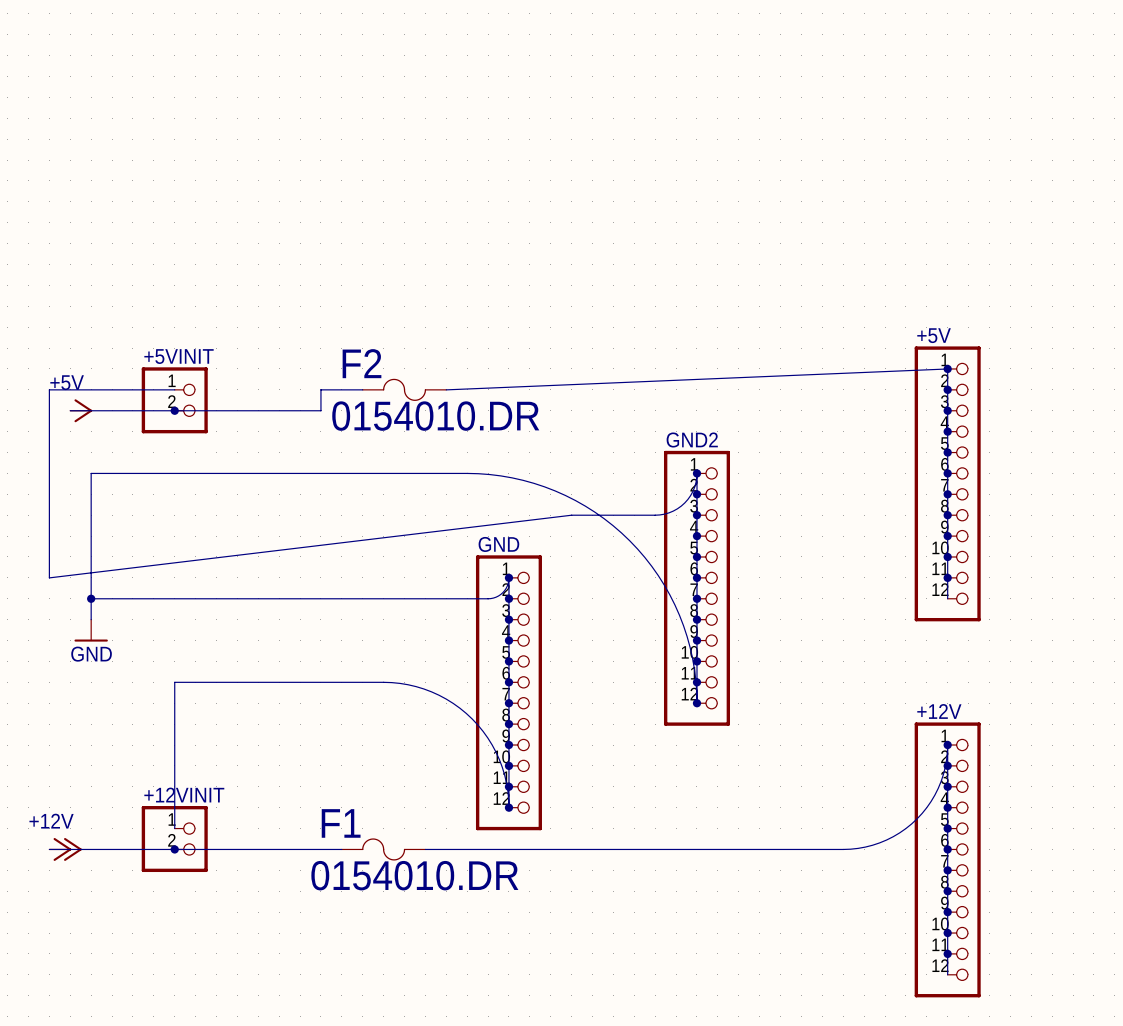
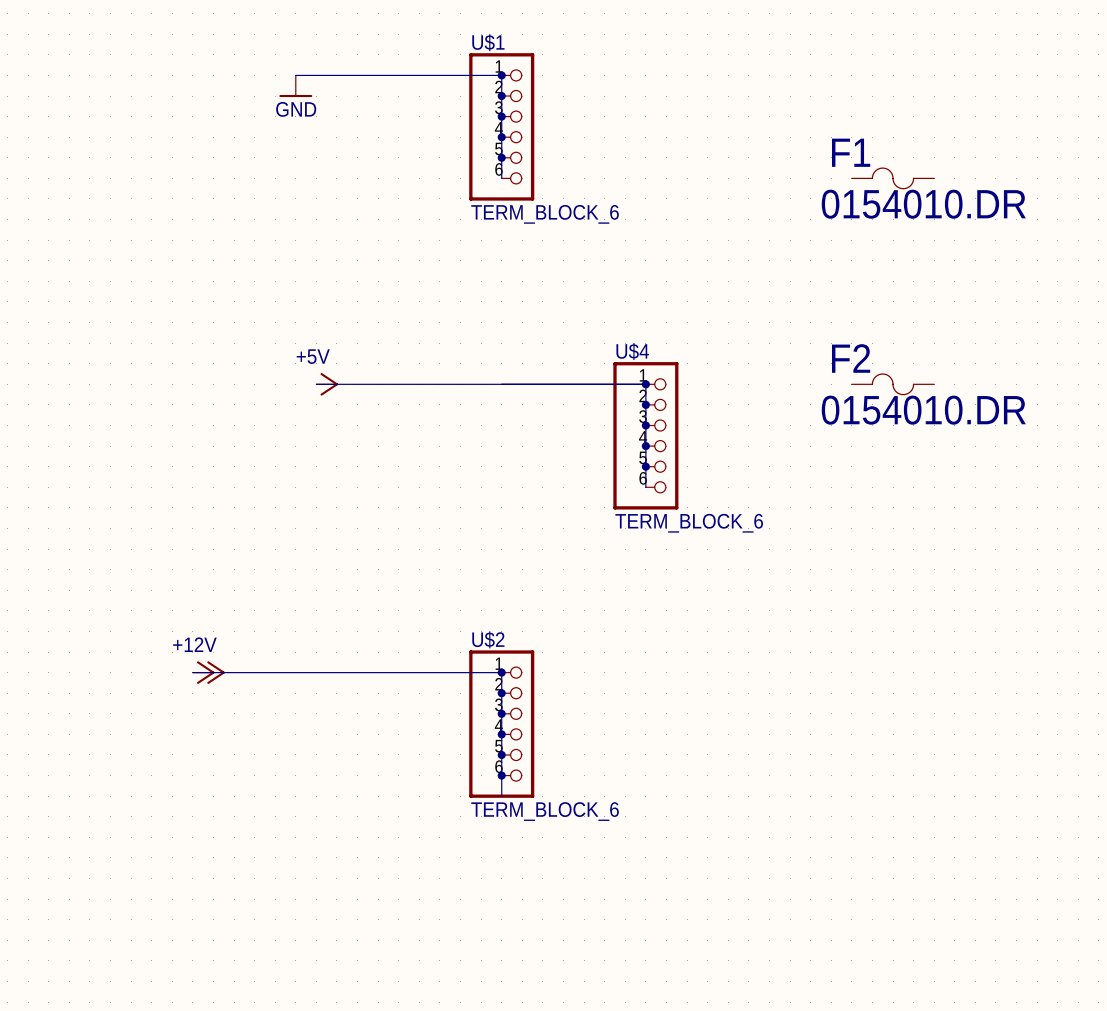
wire: none -> (295, 75) (501, 75) (501, 178)
junction: none -> (501, 75)
power symbol: none -> GND (295, 86)
junction: none -> (501, 96)
junction: none -> (501, 116)
U$1: none -> TERM_BLOCK_6 (501, 126)
junction: none -> (501, 137)
junction: none -> (501, 157)
junction: (947, 368) -> none
wire: (174, 389) (49, 389) (49, 577) (571, 515) (655, 515) (659, 514) (673, 511) (687, 499) (694, 487) (696, 473) (696, 703) (692, 658) (683, 625) (669, 594) (644, 557) (612, 525) (604, 518) (594, 512) (575, 500) (544, 486) (500, 475) (467, 473) (91, 473) (91, 619) -> none
wire: (320, 389) (320, 410) (70, 410) -> none
power symbol: none -> +5V (327, 384)
wire: none -> (357, 384) (645, 384) (645, 487)
F2 position: (404, 389) -> (893, 384)
wire: (446, 389) (947, 368) (947, 598) -> none
junction: none -> (645, 384)
junction: (947, 389) -> none
+5VINIT: (174, 400) -> none
power symbol: +5V (81, 410) -> none
junction: (174, 410) -> none
junction: none -> (645, 404)
junction: (947, 410) -> none
junction: none -> (645, 425)
junction: (947, 431) -> none
U$4: none -> TERM_BLOCK_6 (645, 435)
junction: none -> (645, 446)
junction: (947, 452) -> none
junction: none -> (645, 466)
junction: (696, 473) -> none
junction: (947, 473) -> none
+5V: (947, 483) -> none
junction: (696, 494) -> none
junction: (947, 494) -> none
junction: (696, 515) -> none
junction: (947, 515) -> none
junction: (696, 536) -> none
junction: (947, 536) -> none
junction: (696, 556) -> none
junction: (947, 556) -> none
junction: (508, 577) -> none
junction: (696, 577) -> none
junction: (947, 577) -> none
GND2: (696, 588) -> none
wire: (91, 598) (488, 598) (496, 597) (502, 592) (507, 585) (508, 577) (508, 682) -> none
junction: (91, 598) -> none
junction: (508, 598) -> none
junction: (696, 598) -> none
junction: (508, 619) -> none
junction: (696, 619) -> none
power symbol: GND (91, 630) -> none
junction: (508, 640) -> none
junction: (696, 640) -> none
junction: (508, 661) -> none
junction: (696, 661) -> none
wire: (195, 682) (174, 682) (174, 828) -> none
power symbol: none -> +12V (208, 672)
wire: (383, 682) (408, 684) (431, 691) (453, 703) (472, 719) (487, 738) (499, 759) (506, 783) (508, 807) -> (378, 672) (501, 672)
junction: (696, 682) -> none
GND: (508, 692) -> none
junction: (696, 703) -> none
U$2: none -> TERM_BLOCK_6 (501, 724)
junction: (947, 745) -> none
junction: (947, 765) -> none
junction: (947, 786) -> none
junction: (508, 807) -> none
junction: (947, 807) -> none
junction: (947, 828) -> none
+12VINIT: (174, 839) -> none
wire: (49, 849) (341, 849) -> none
power symbol: +12V (65, 849) -> none
junction: (174, 849) -> none
F1 position: (383, 849) -> (893, 178)
wire: (425, 849) (843, 849) (865, 847) (879, 842) (899, 832) (917, 818) (926, 807) (941, 781) (946, 759) (947, 745) (947, 974) -> none
junction: (947, 849) -> none
+12V: (947, 859) -> none
junction: (947, 870) -> none
junction: (947, 891) -> none
junction: (947, 912) -> none
junction: (947, 933) -> none
junction: (947, 953) -> none

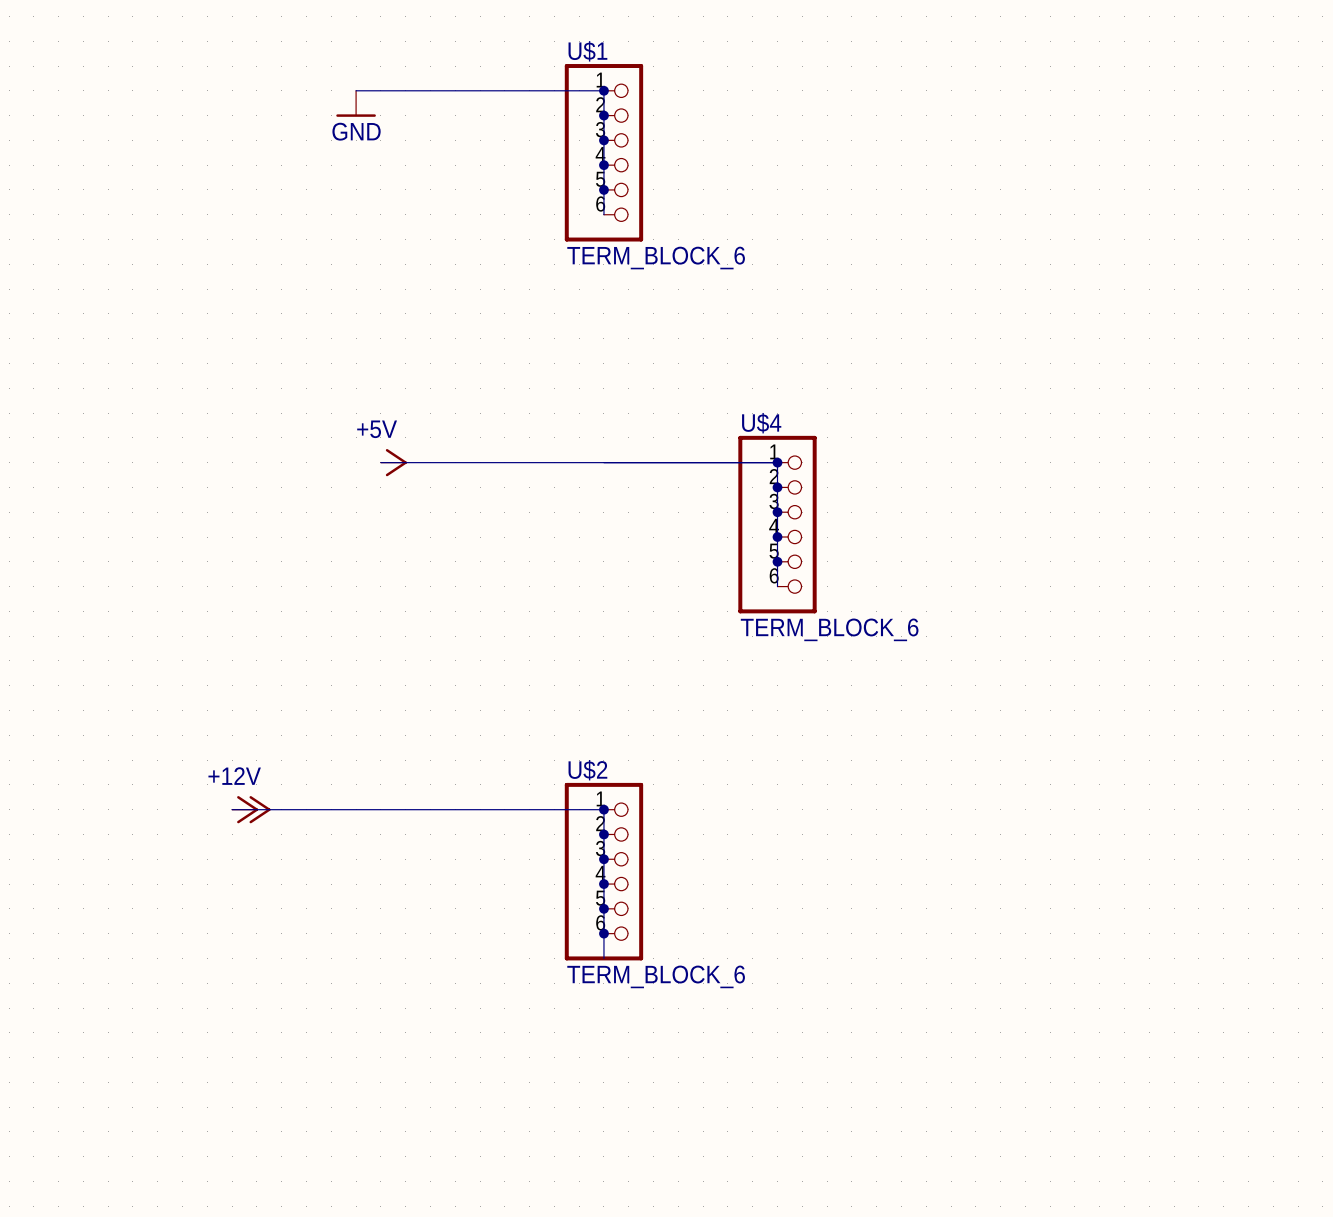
F1: 0154010.DR (893, 178) -> none
F2: 0154010.DR (893, 384) -> none

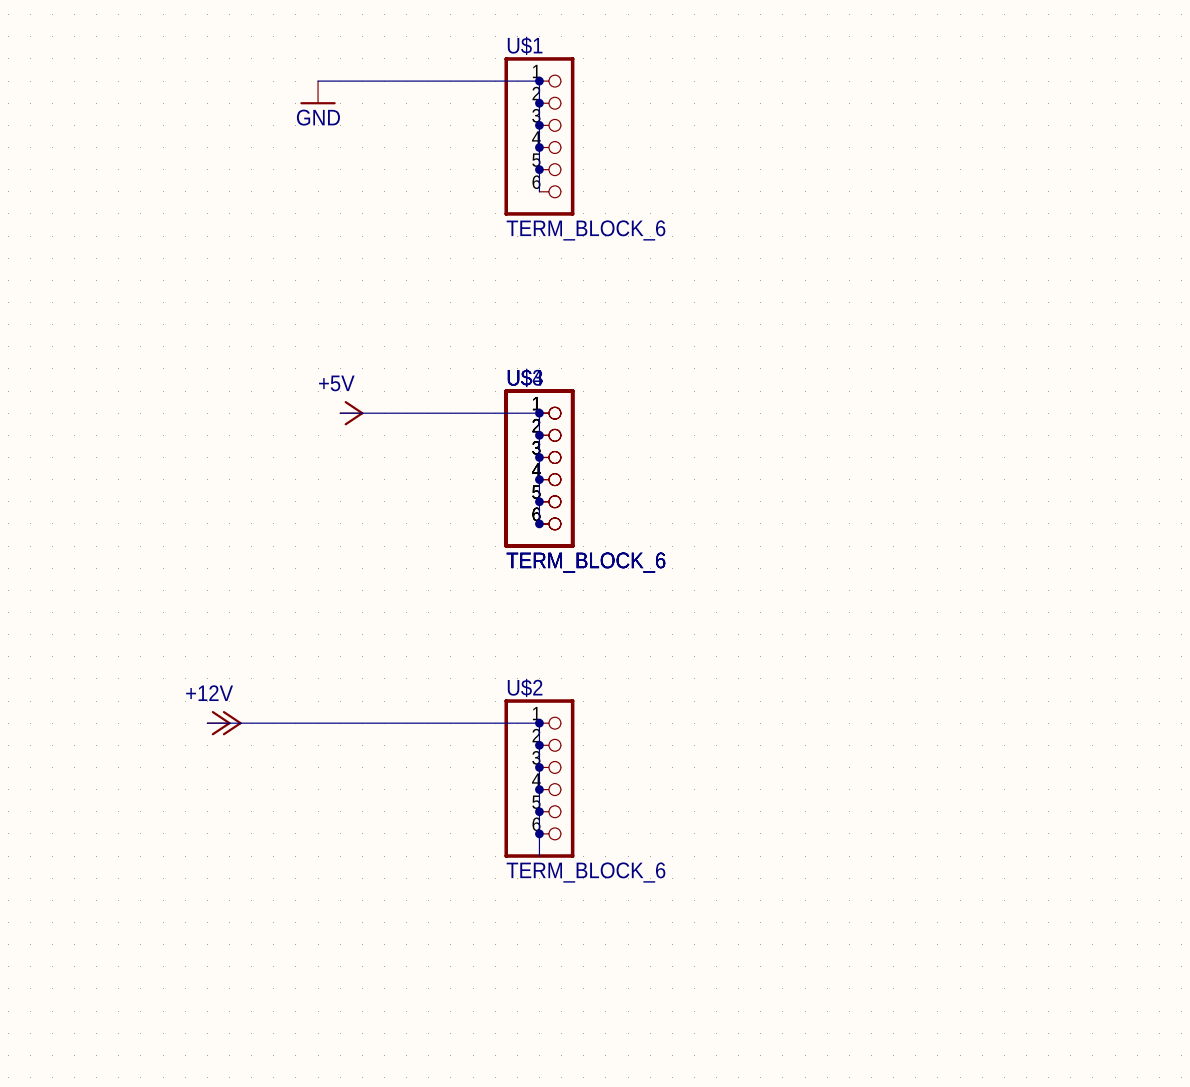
wire: (603, 462) (777, 462) (777, 586) -> (539, 413) (539, 523)
junction: none -> (539, 413)
junction: (777, 462) -> none
junction: none -> (539, 435)
junction: (777, 487) -> none
junction: none -> (539, 457)
junction: (777, 512) -> none
part: none -> TERM_BLOCK_6 (539, 468)
U$4 position: (777, 524) -> (539, 468)
junction: none -> (539, 479)
junction: (777, 537) -> none
junction: none -> (539, 501)
junction: (777, 561) -> none
junction: none -> (539, 523)

